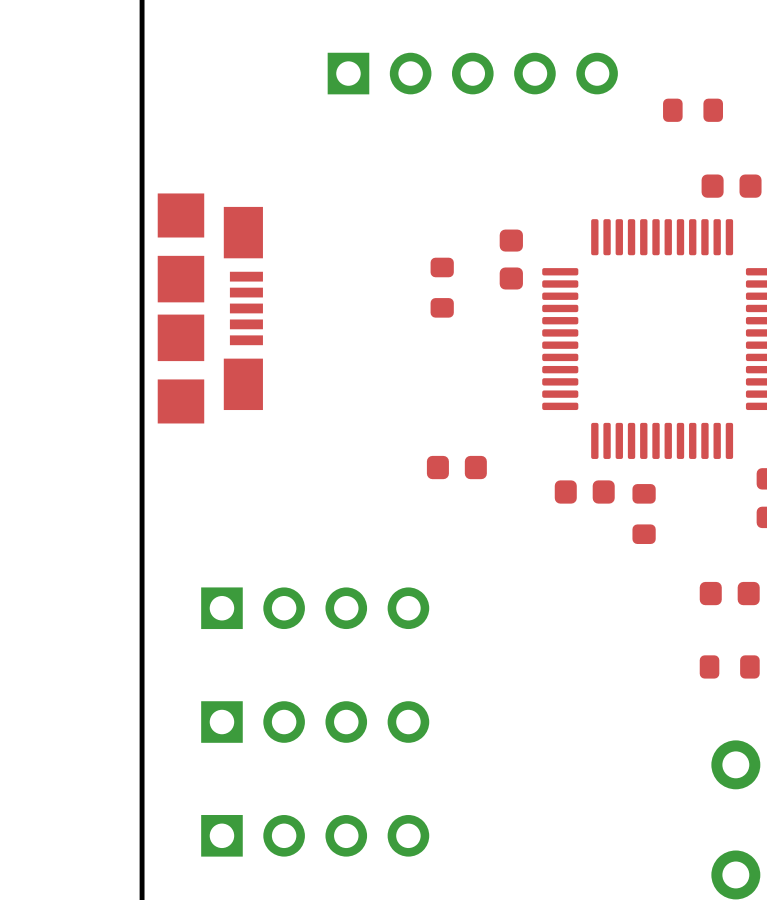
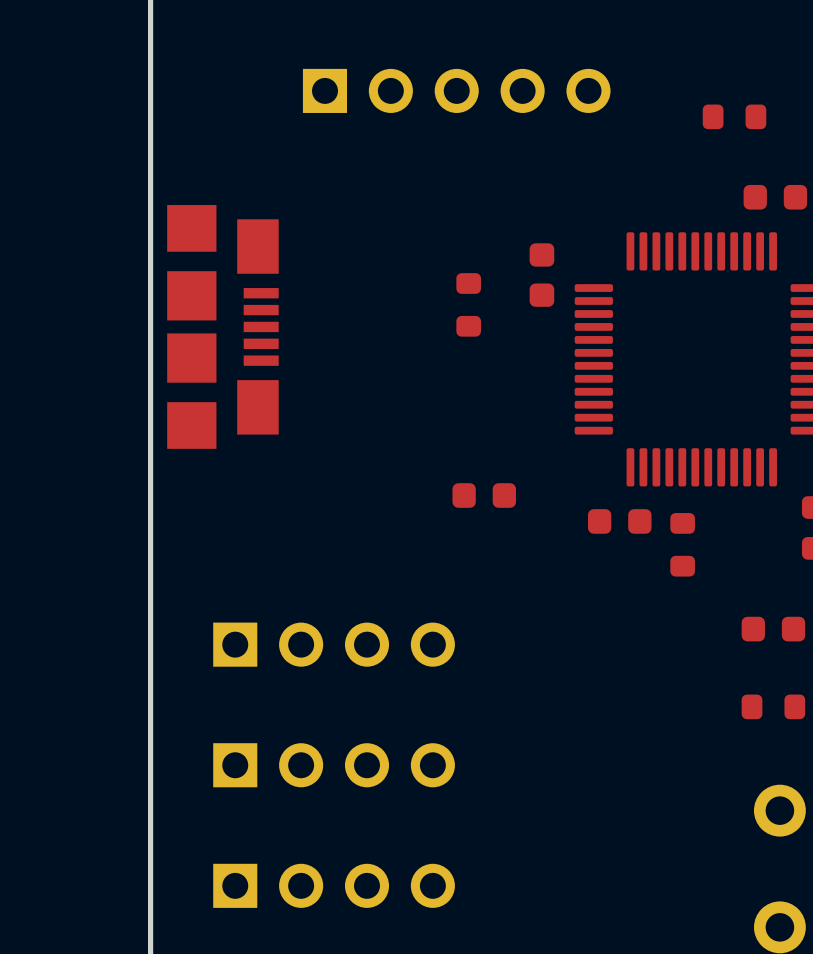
part position: (472, 73) -> (456, 90)

